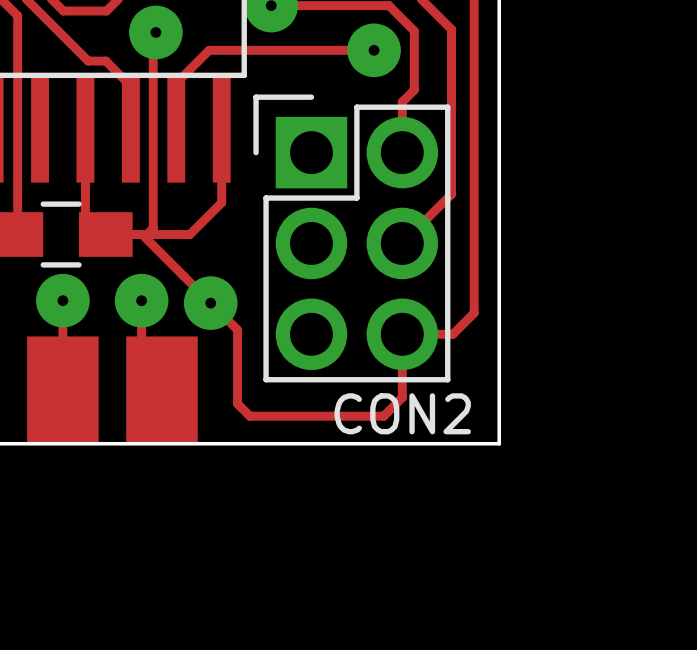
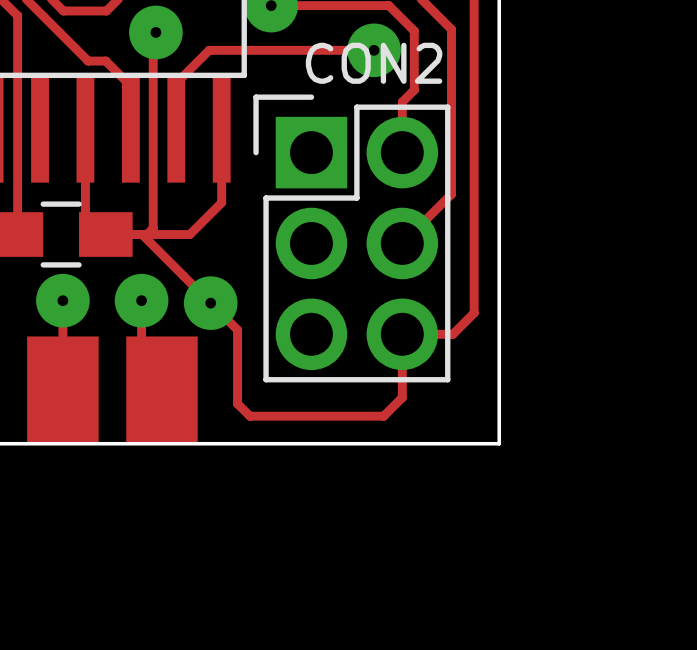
CON2 name position: CON2 (402, 413) -> CON2 (374, 63)

